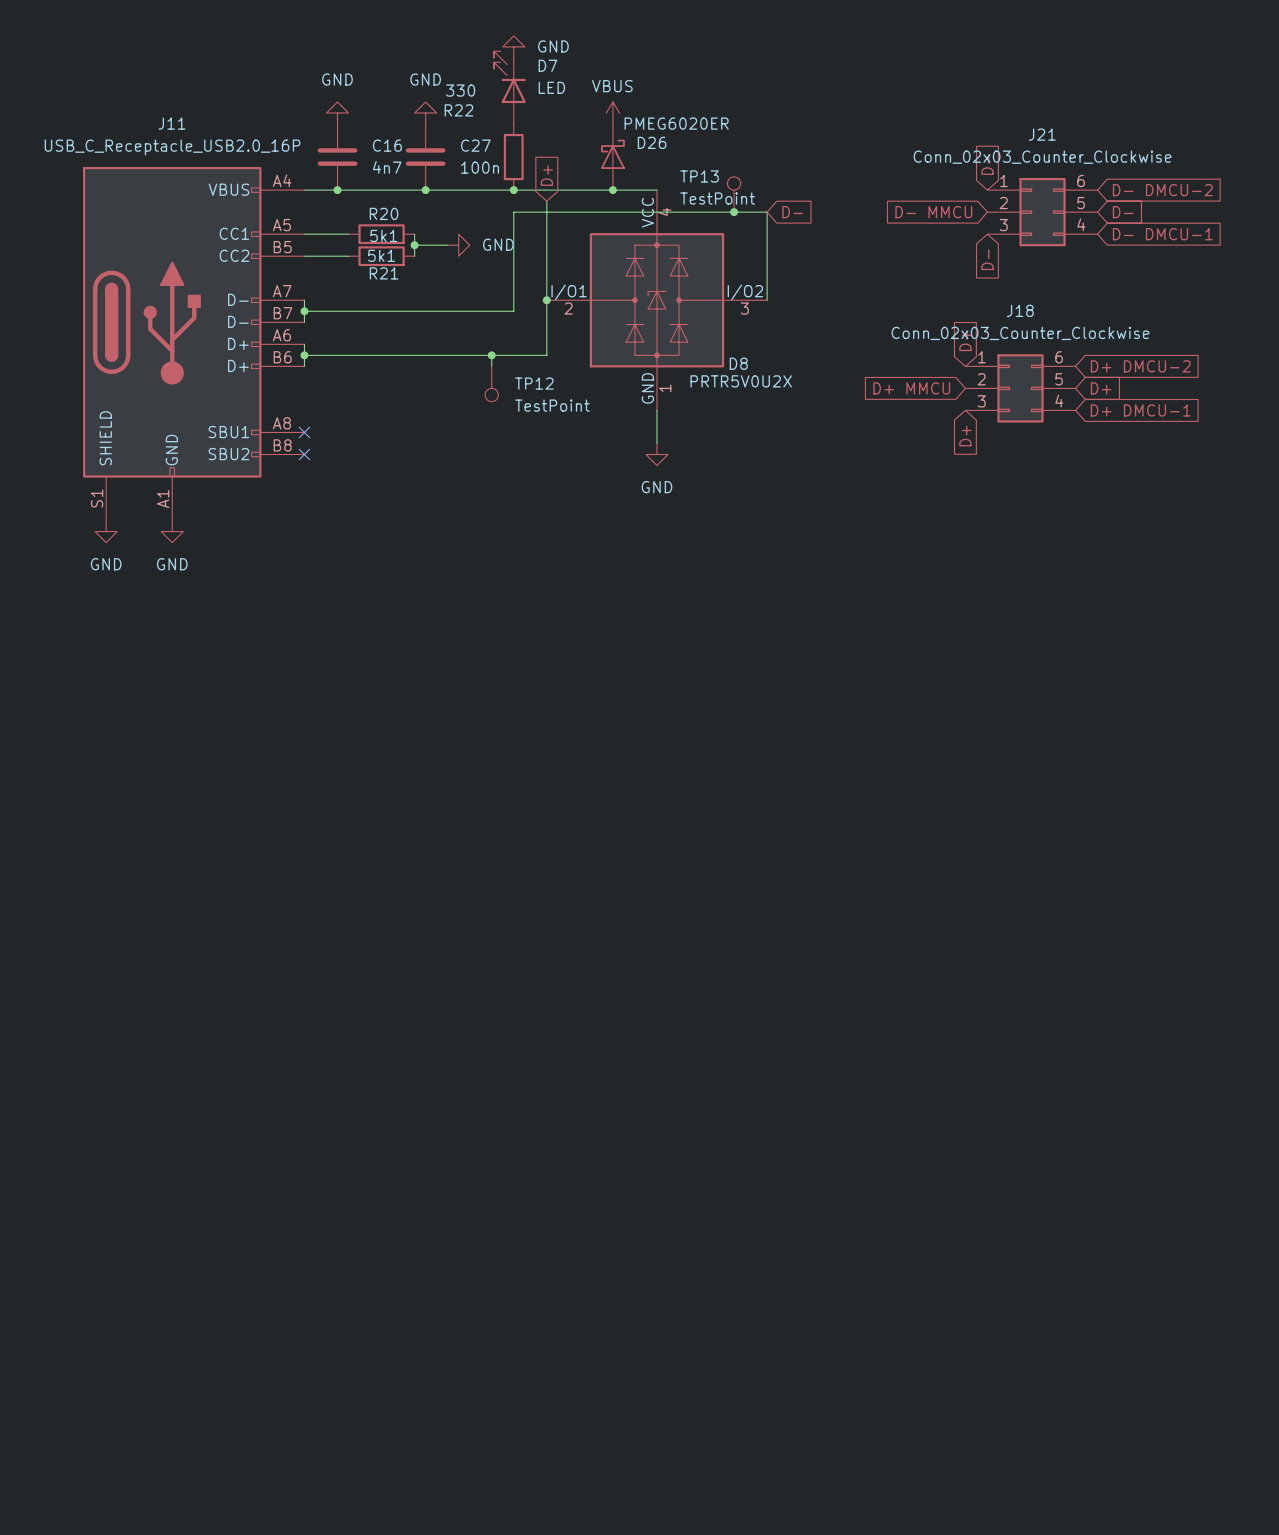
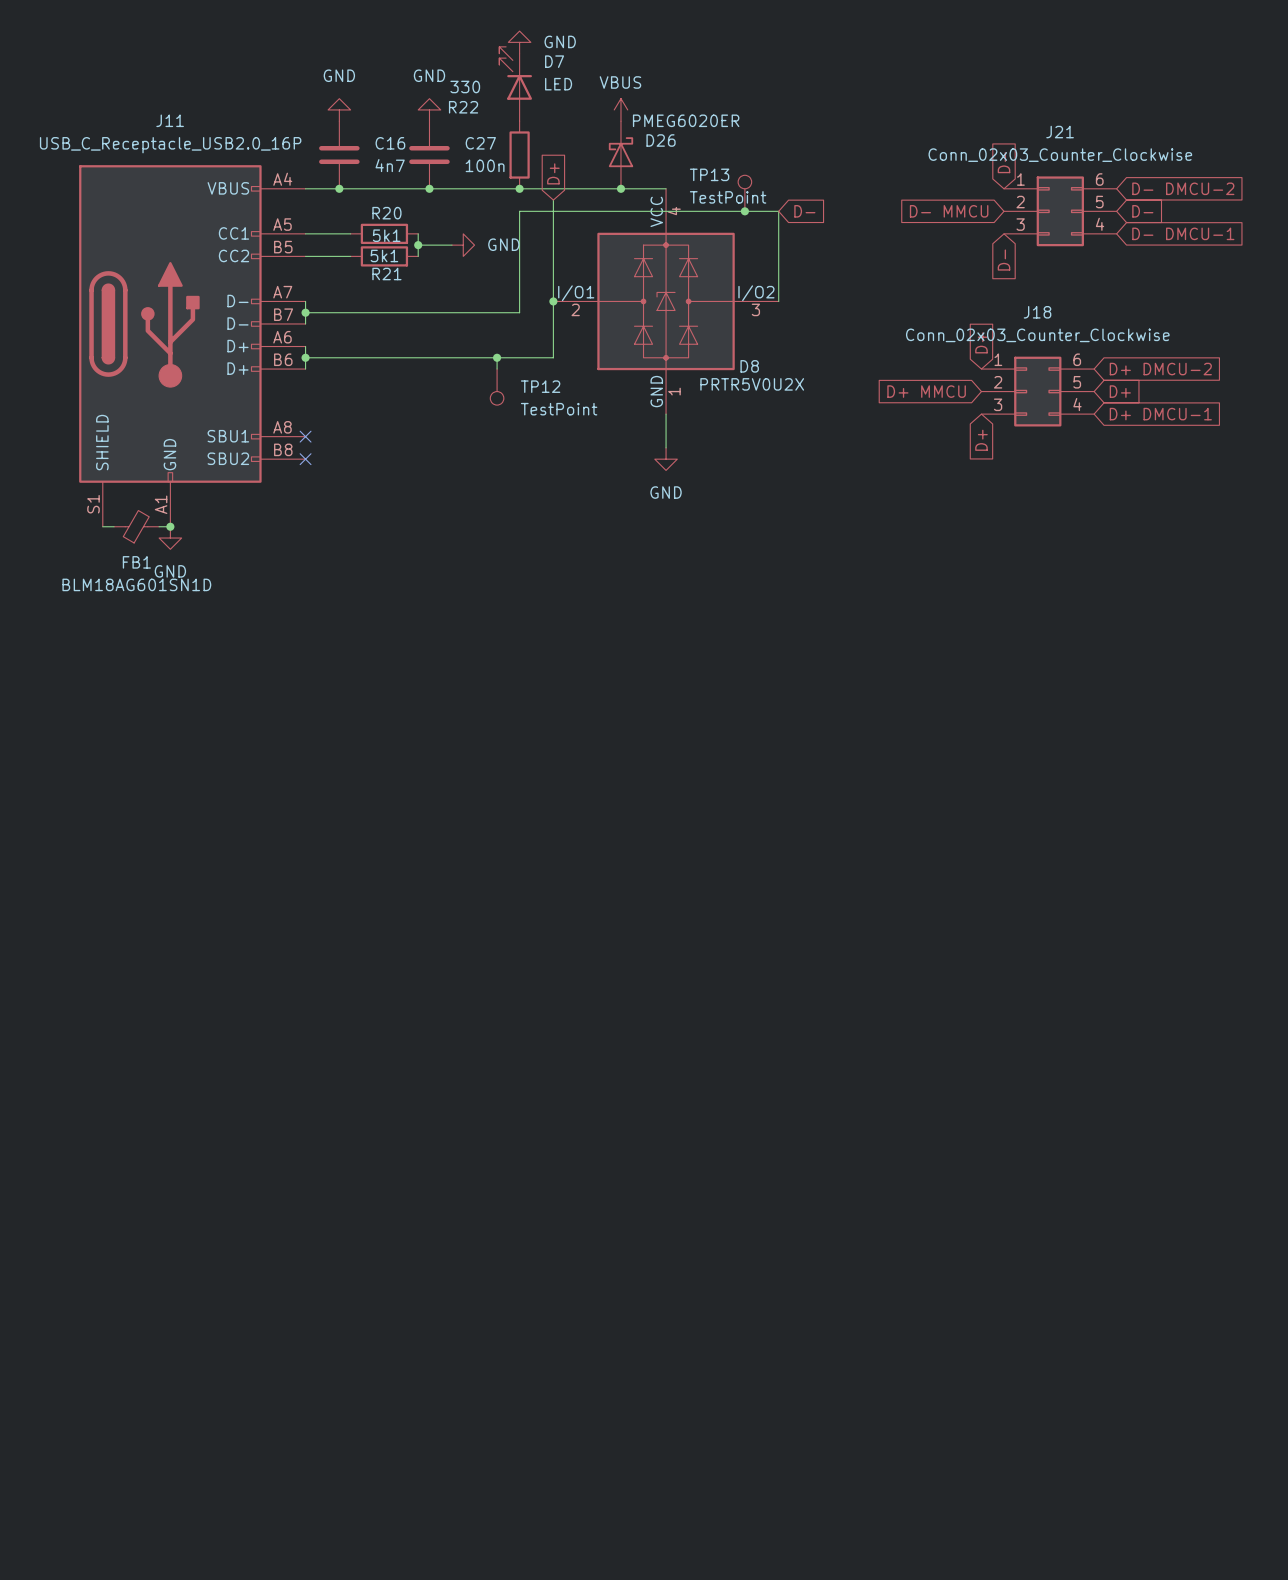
wire: none -> (102, 526) (114, 526)
FB1: none -> BLM18AG601SN1D (136, 526)
wire: none -> (159, 526) (170, 526)
junction: none -> (170, 526)
power symbol: GND (106, 531) -> none

